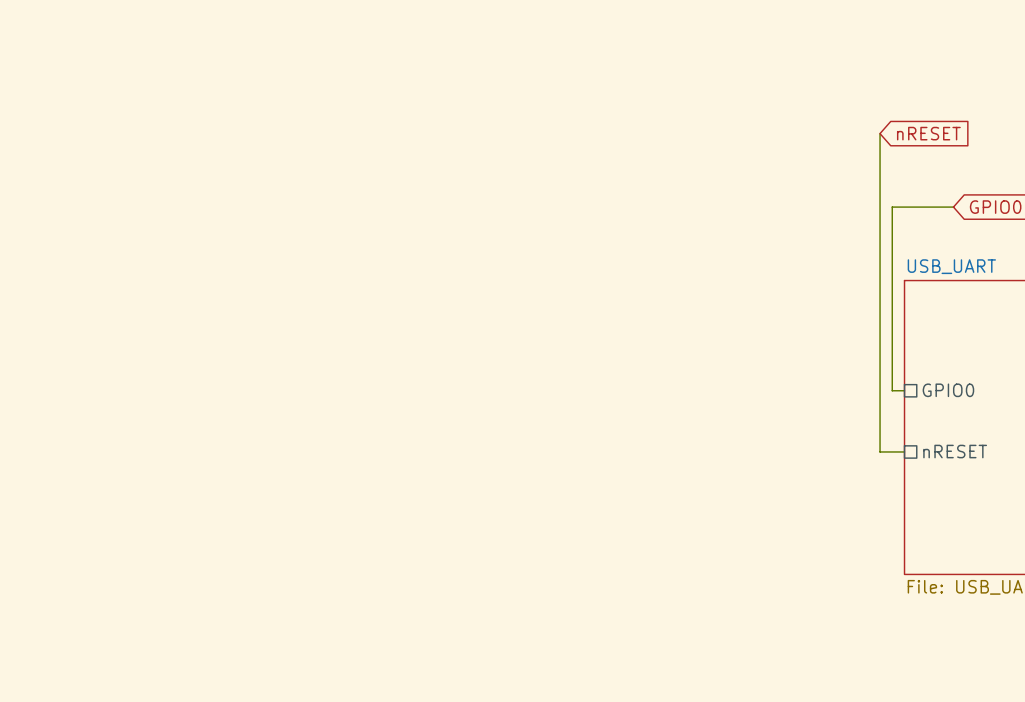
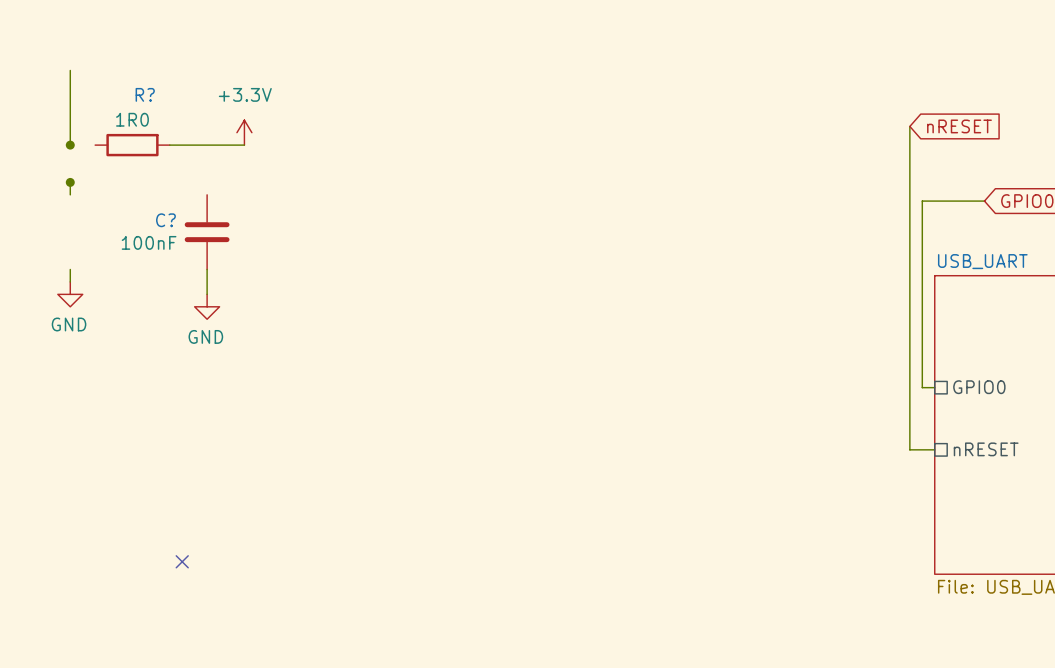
wire: none -> (70, 70) (70, 145)
power symbol: none -> +3.3V (244, 132)
junction: none -> (70, 145)
R?: none -> 1R0 (132, 145)
wire: none -> (169, 145) (244, 145)
wire: none -> (70, 182) (70, 194)
junction: none -> (70, 182)
C?: none -> 100nF (207, 232)
wire: none -> (70, 269) (70, 281)
wire: none -> (207, 269) (207, 294)
power symbol: none -> GND (70, 294)
power symbol: none -> GND (207, 306)
no-connect mark: none -> (182, 561)

